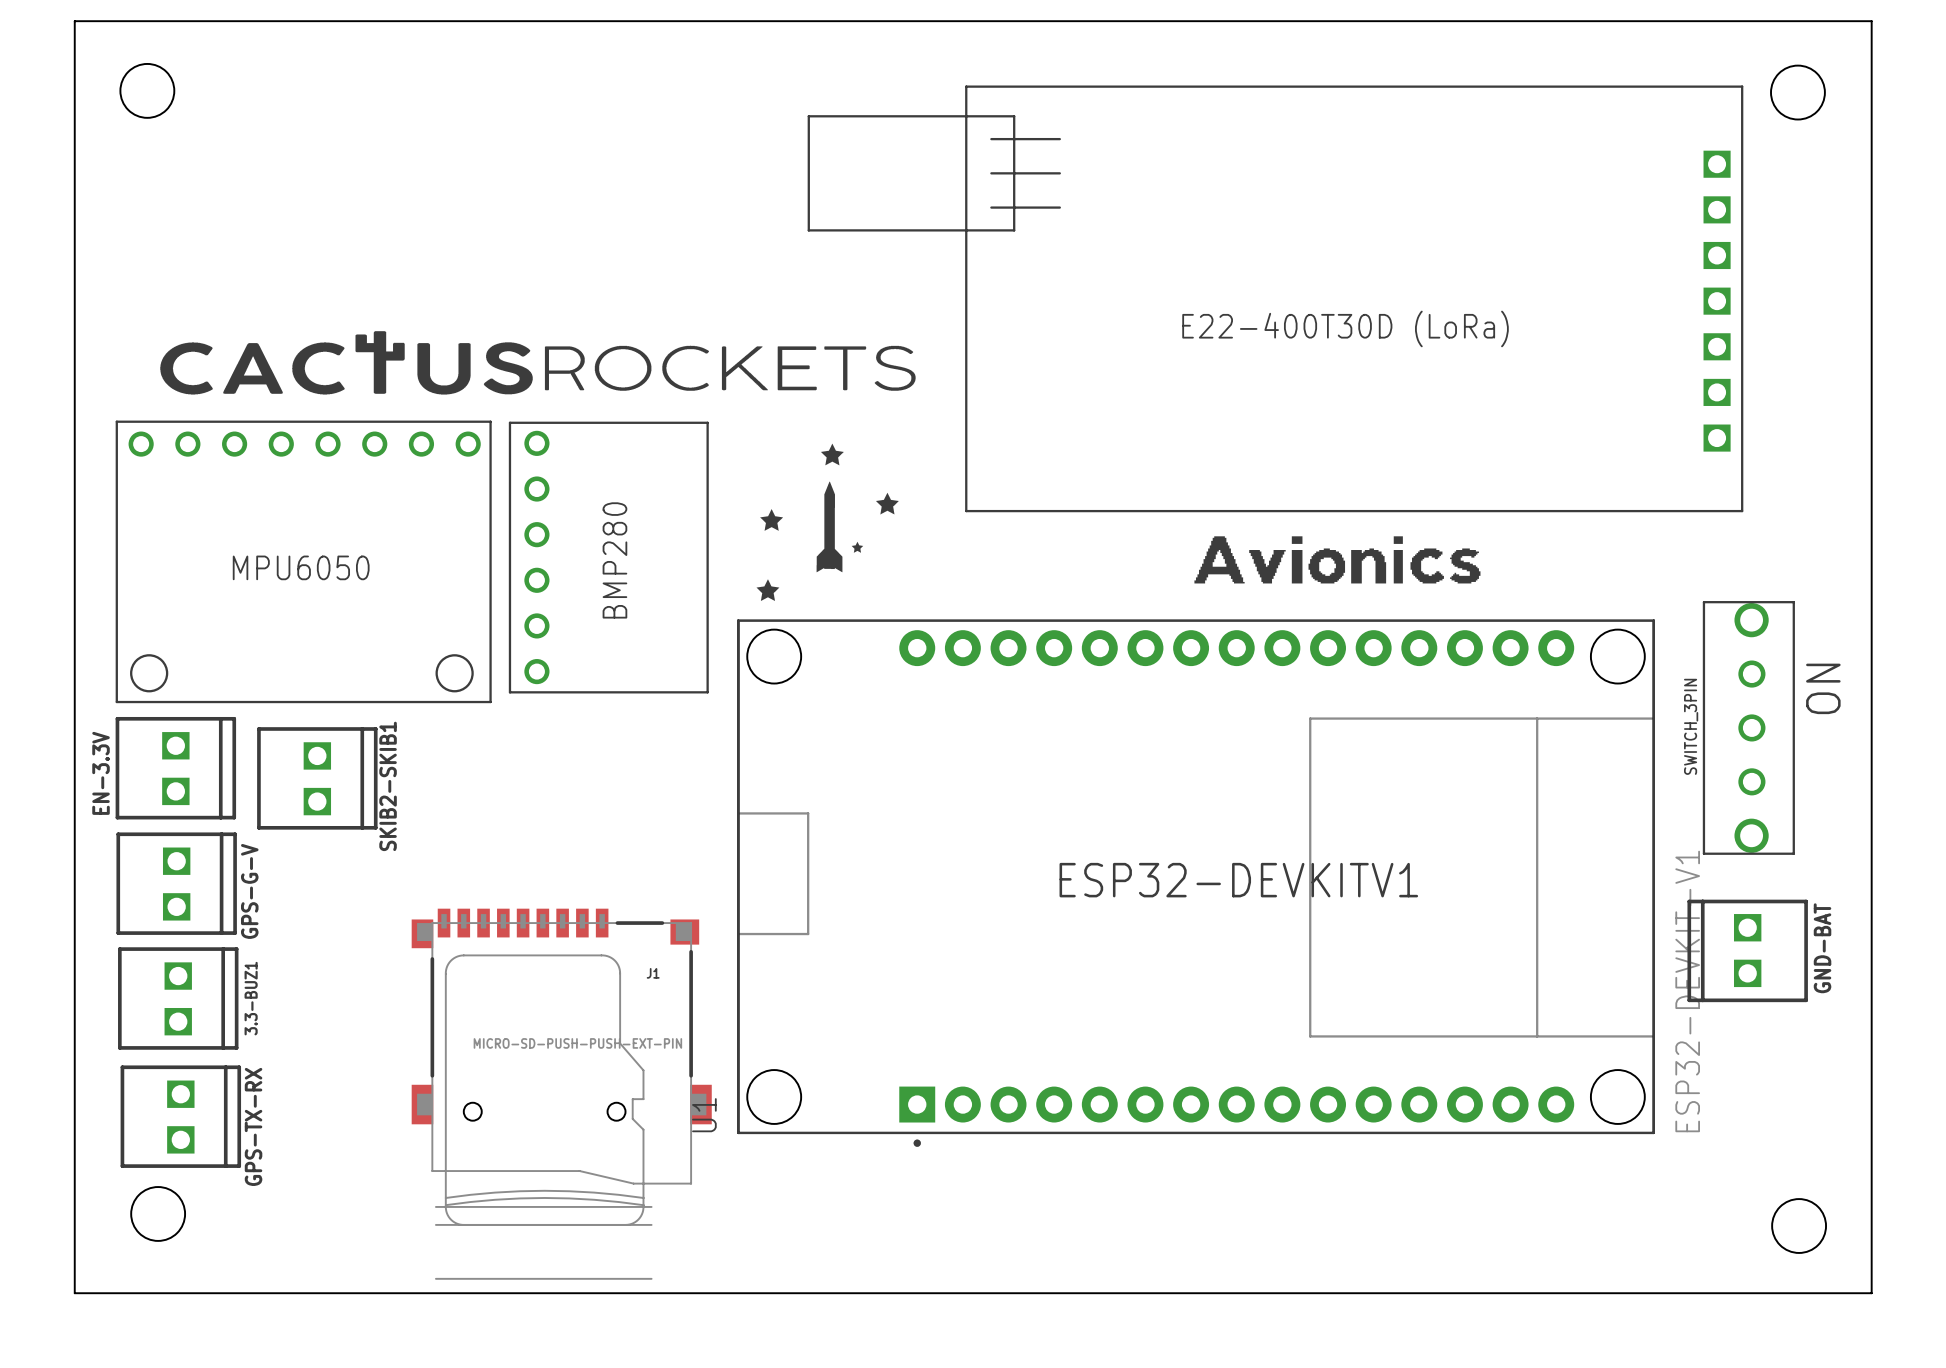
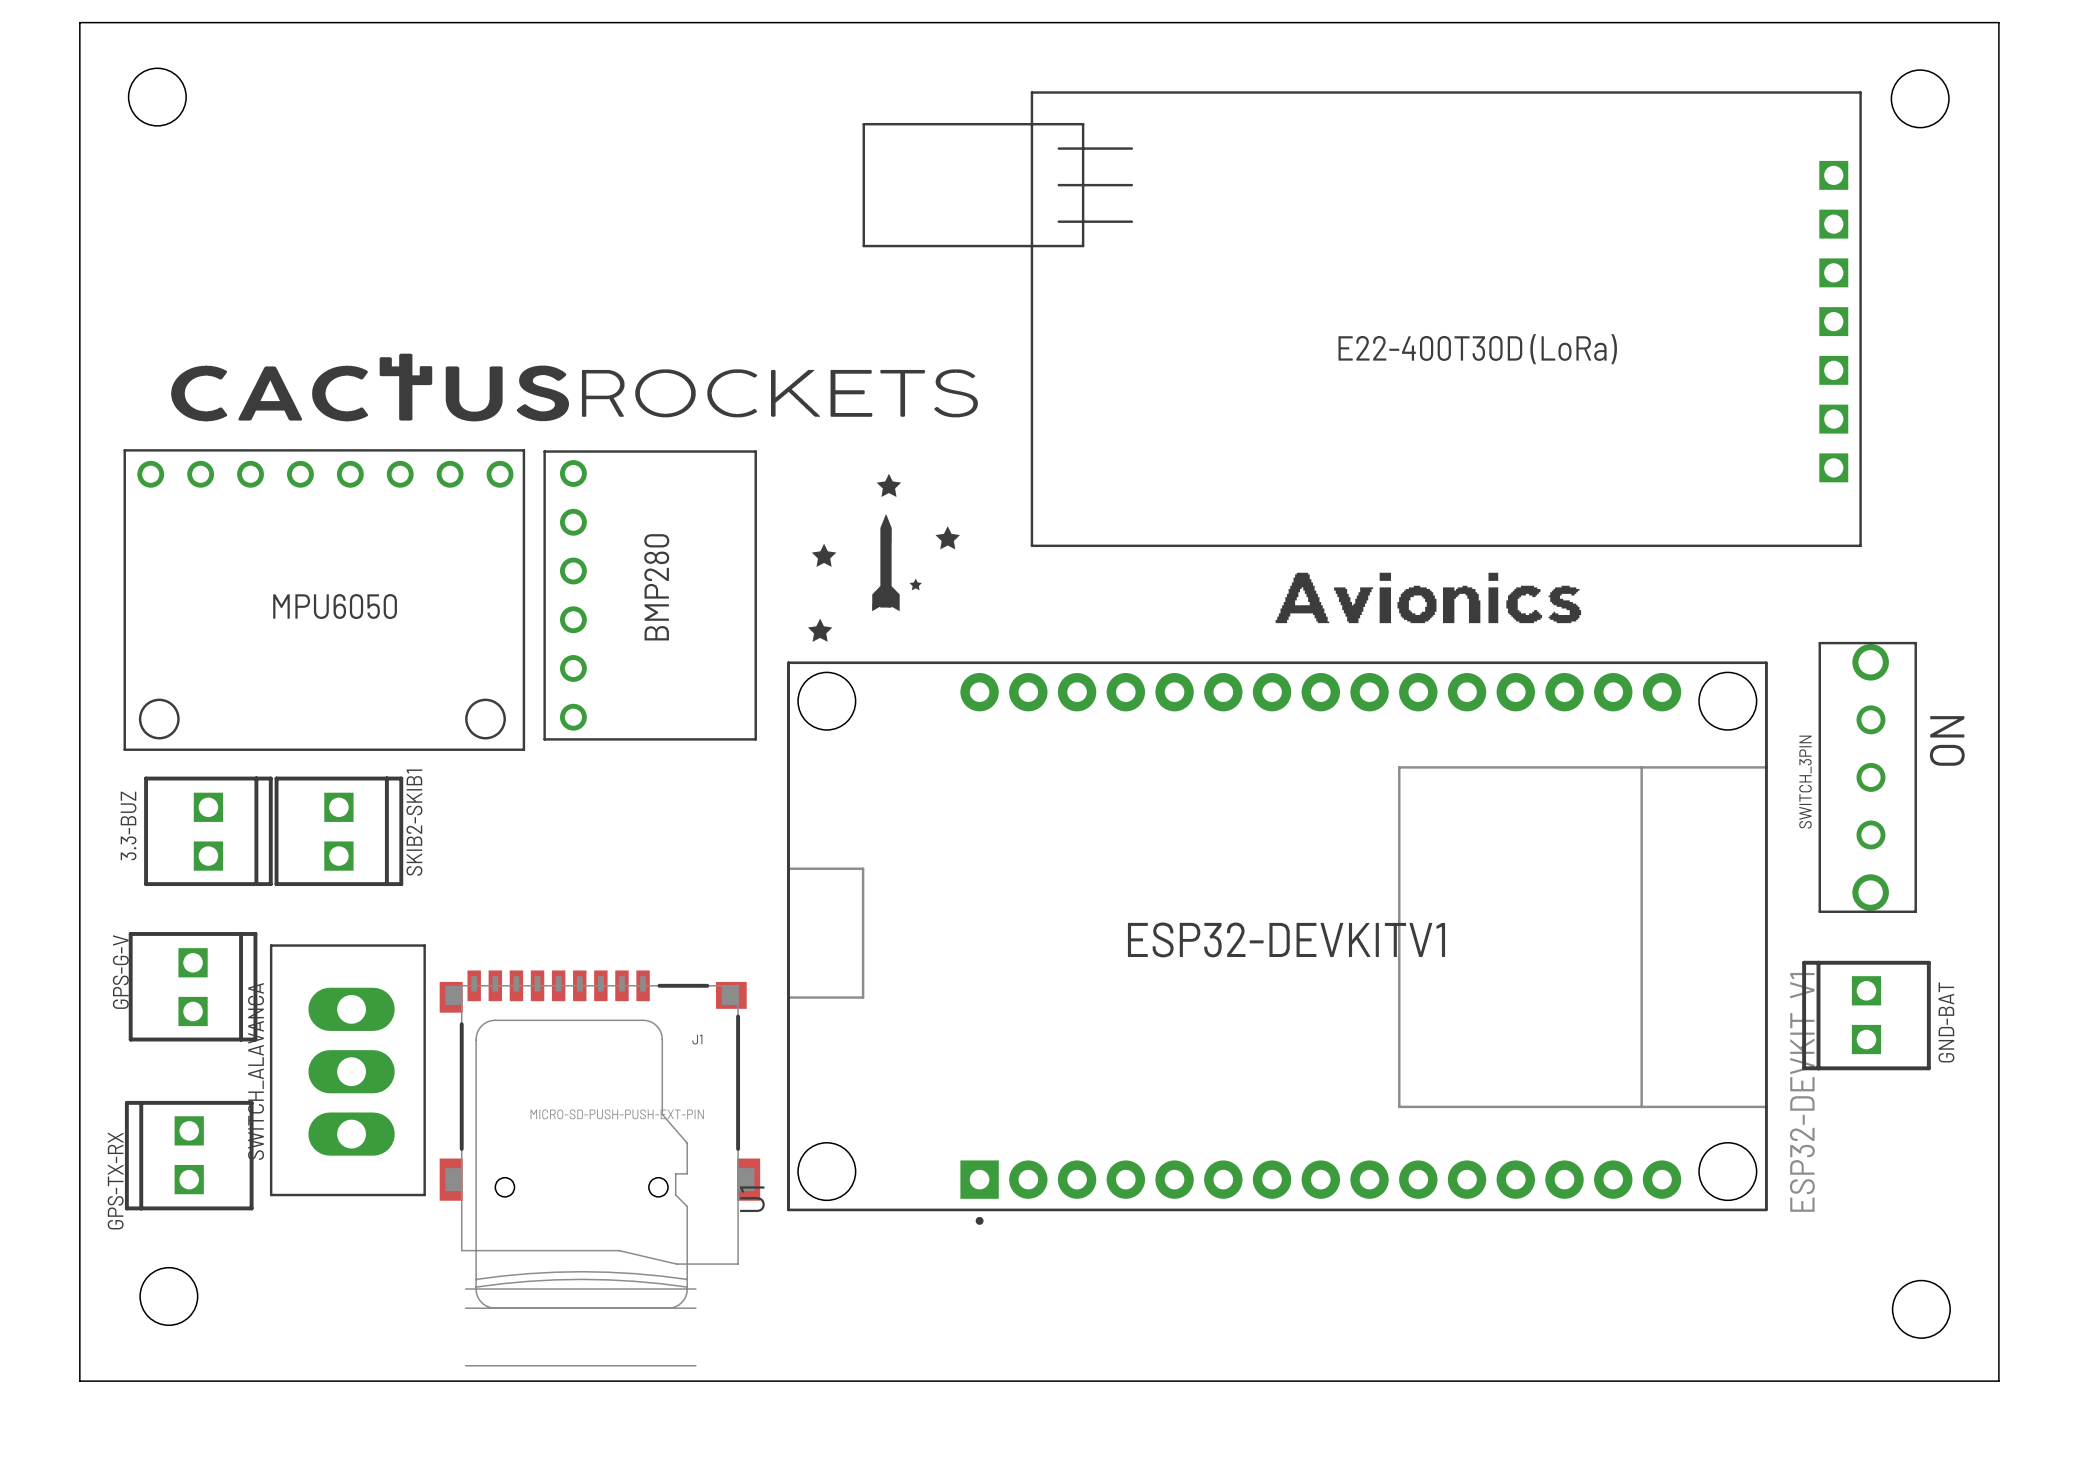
EN-3.3V: (175, 768) -> none
3.3-BUZ: none -> (208, 831)
GPS-G-V position: (176, 883) -> (193, 986)
GPS-G-V name position: GPS-G-V (249, 891) -> GPS-G-V (120, 972)
3.3-BUZ1: (178, 998) -> none
part: none -> (347, 1070)
GPS-TX-RX rotation: 0° (180, 1116) -> 180° (189, 1155)

